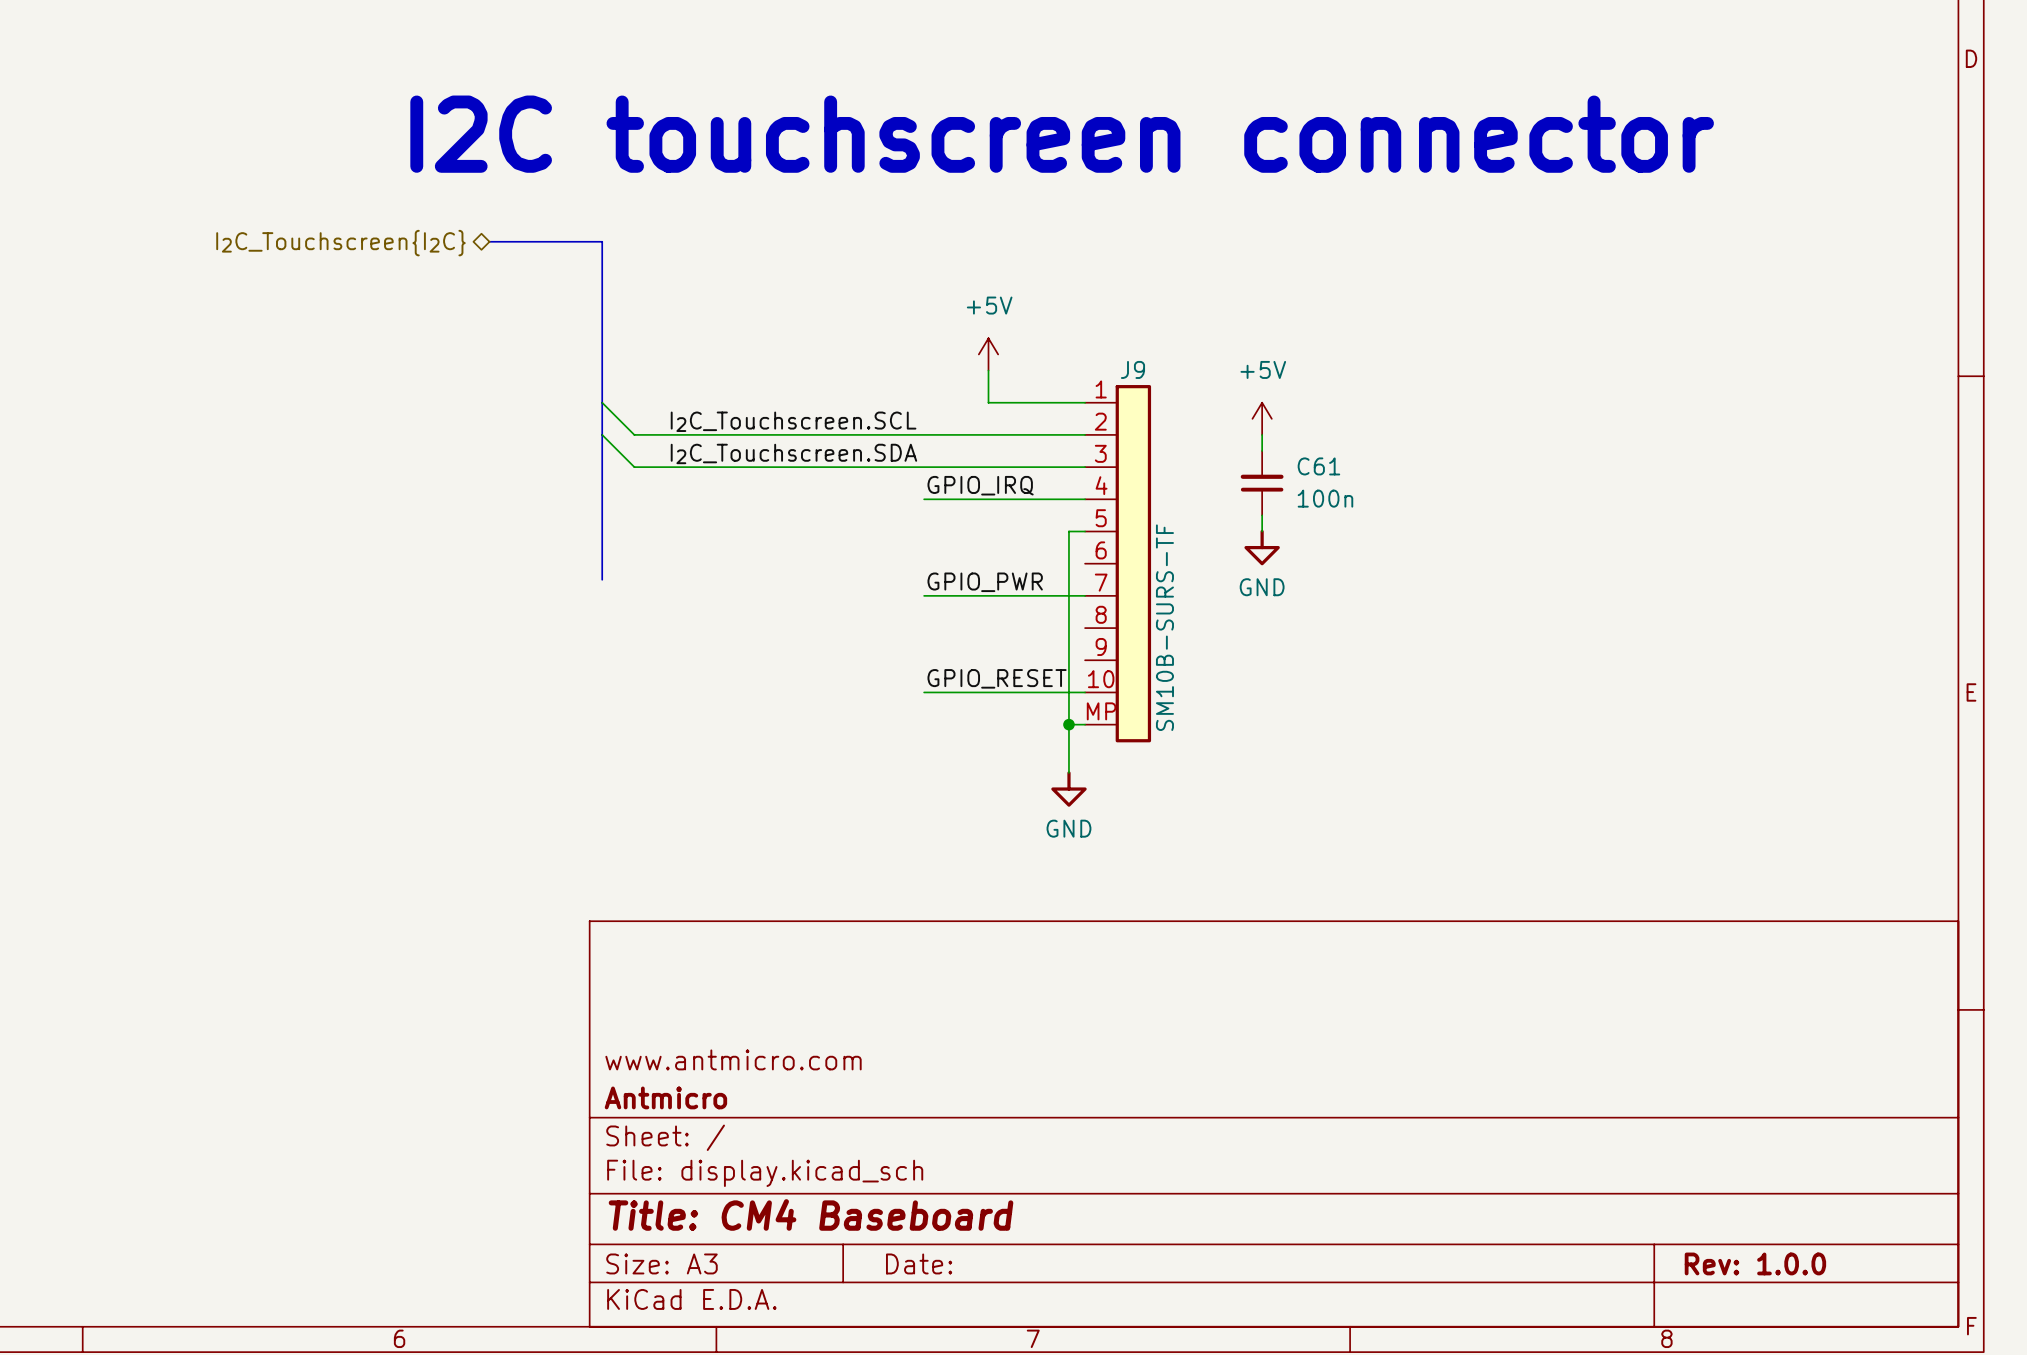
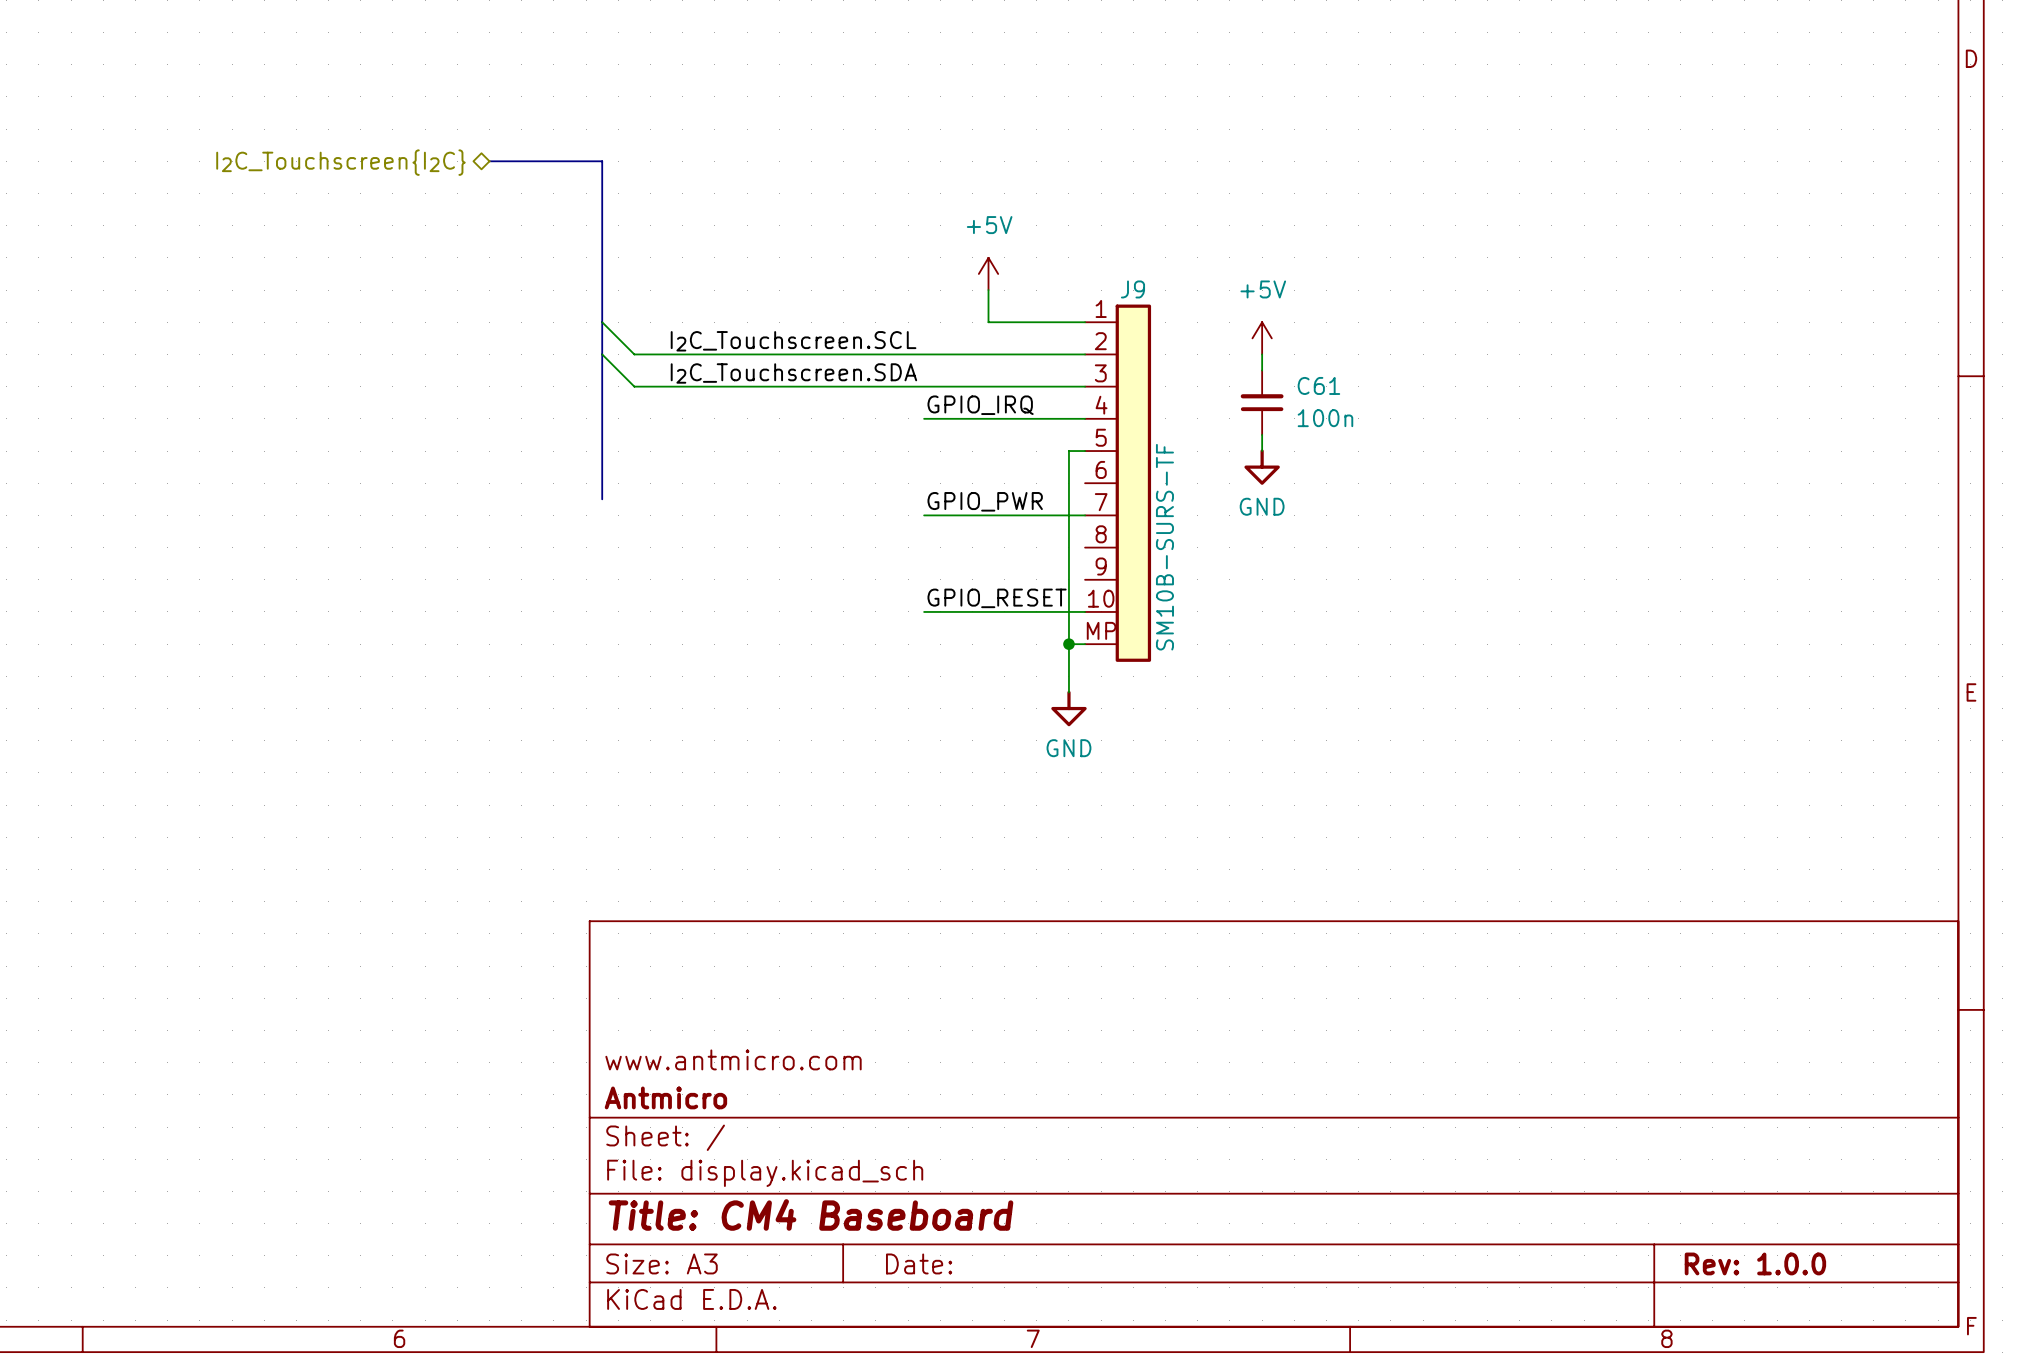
text: I2C touchscreen connector (1062, 134) -> none
bus: (489, 241) (602, 241) -> (489, 161) (602, 161) (602, 241)
hierarchical label position: I2C_Touchscreen{I2C} (340, 243) -> I2C_Touchscreen{I2C} (340, 162)
power symbol position: +5V (988, 354) -> +5V (988, 273)
wire: (988, 370) (988, 402) (1085, 402) -> (988, 290) (988, 322) (1085, 322)
wire: (602, 402) (634, 434) (1085, 434) -> (602, 322) (634, 354) (1085, 354)
power symbol position: +5V (1262, 418) -> +5V (1262, 338)
label position: I2C_Touchscreen.SCL (793, 421) -> I2C_Touchscreen.SCL (793, 341)
wire: (602, 434) (634, 467) (1085, 467) -> (602, 354) (634, 386) (1085, 386)
label position: I2C_Touchscreen.SDA (793, 453) -> I2C_Touchscreen.SDA (793, 373)
C61 position: (1262, 483) -> (1262, 402)
label position: GPIO_IRQ (980, 485) -> GPIO_IRQ (980, 405)
bus: (602, 499) (602, 579) -> none
wire: (924, 499) (1085, 499) -> (924, 418) (1085, 418)
wire: (1262, 515) (1262, 531) -> (1262, 354) (1262, 370)
wire: (1068, 531) (1085, 531) -> (1068, 531) (1068, 451) (1085, 451)
power symbol position: GND (1262, 547) -> GND (1262, 467)
J9 position: (1118, 563) -> (1118, 483)
label position: GPIO_PWR (985, 582) -> GPIO_PWR (985, 501)
wire: (924, 595) (1085, 595) -> (924, 515) (1085, 515)
junction: none -> (1068, 644)
label position: GPIO_RESET (997, 678) -> GPIO_RESET (997, 598)
wire: (924, 692) (1085, 692) -> (924, 611) (1085, 611)
wire: (1068, 692) (1068, 772) -> none
wire: (1068, 724) (1085, 724) -> (1068, 644) (1085, 644)
junction: (1068, 724) -> none
power symbol position: GND (1068, 789) -> GND (1068, 708)

